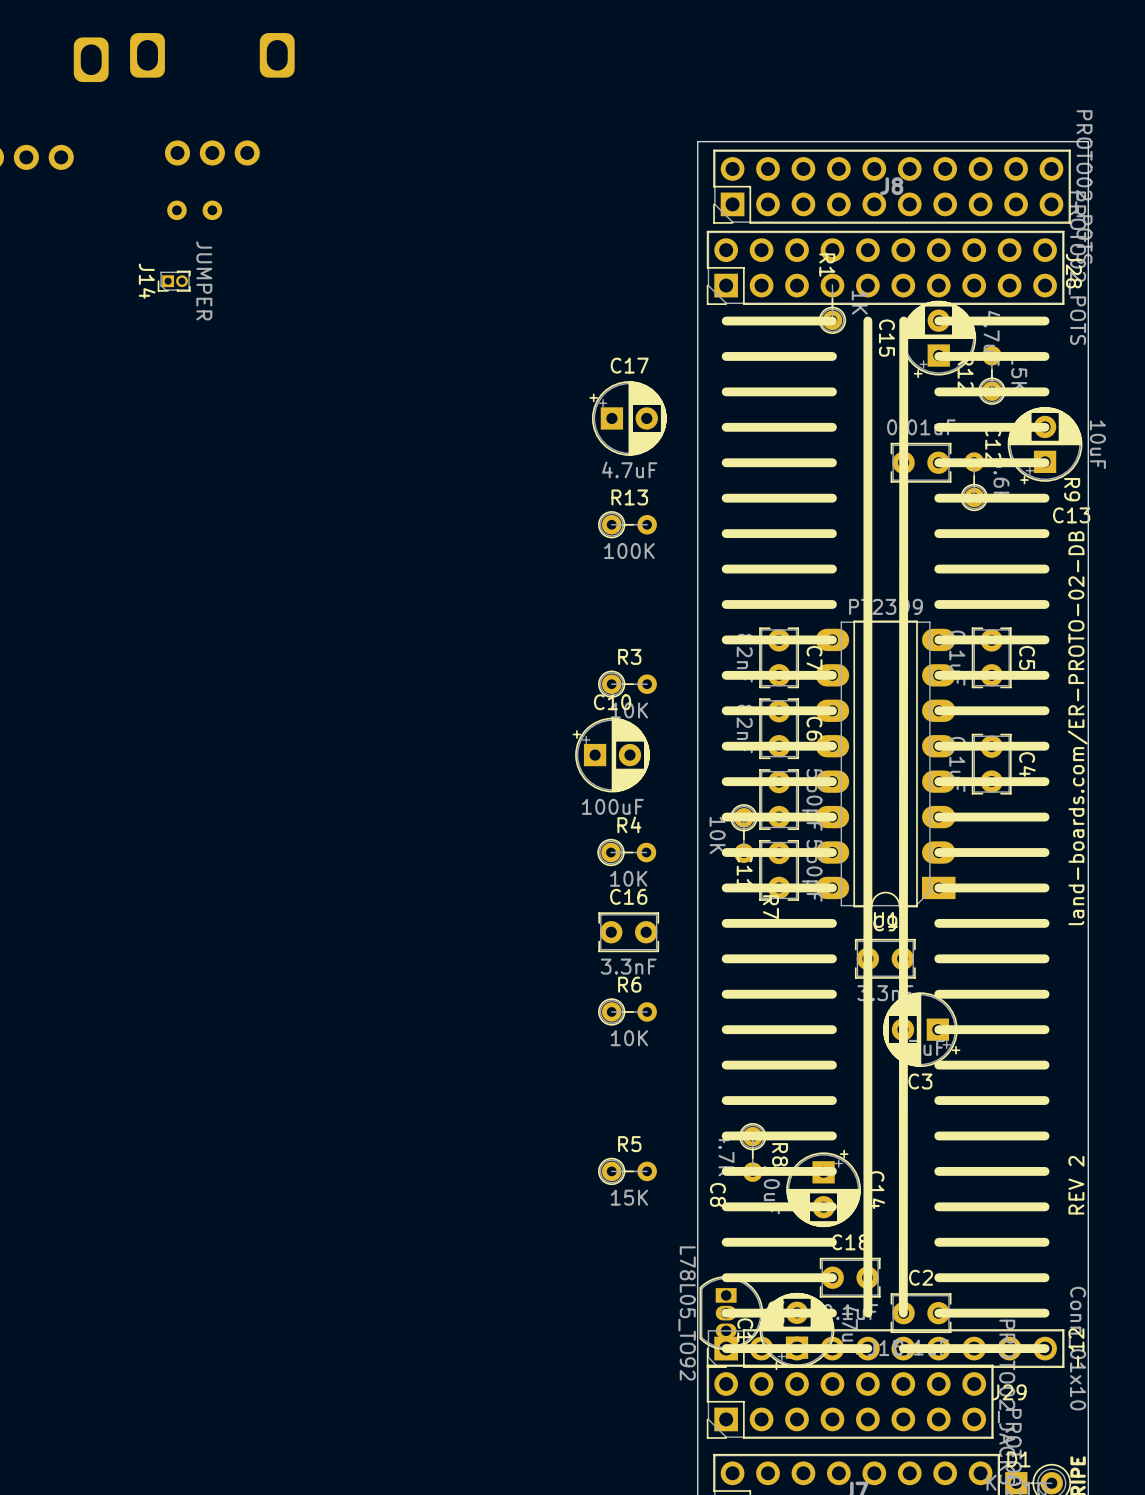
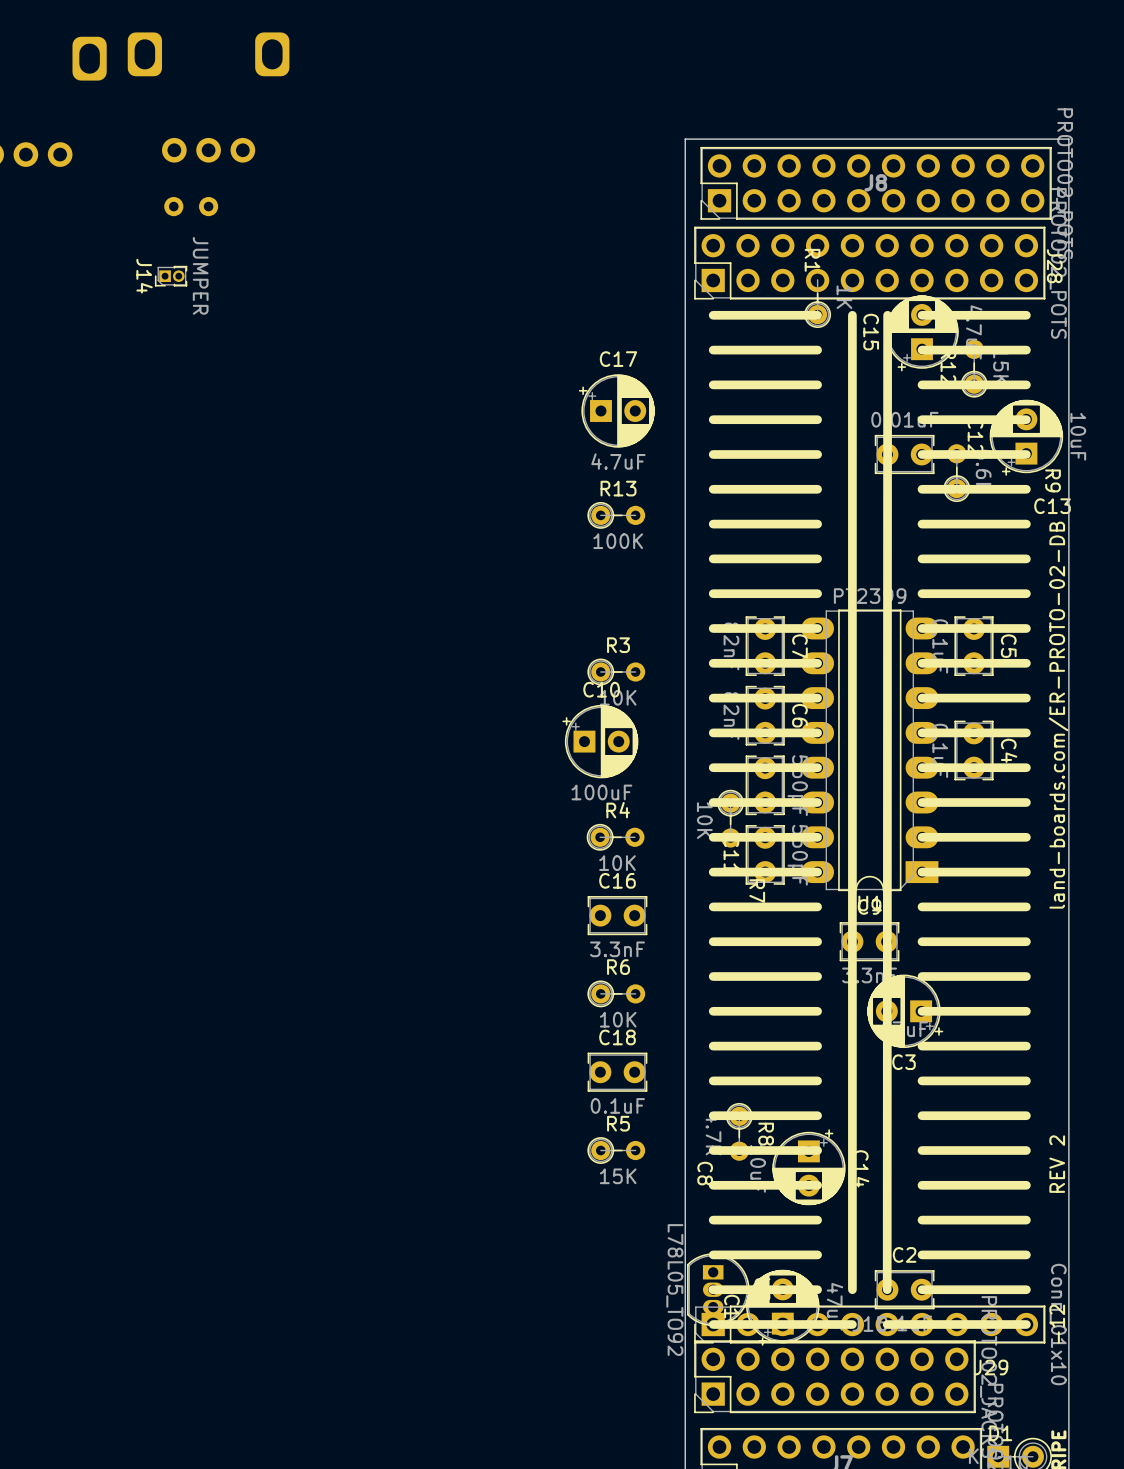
C18 position: (850, 1277) -> (617, 1072)

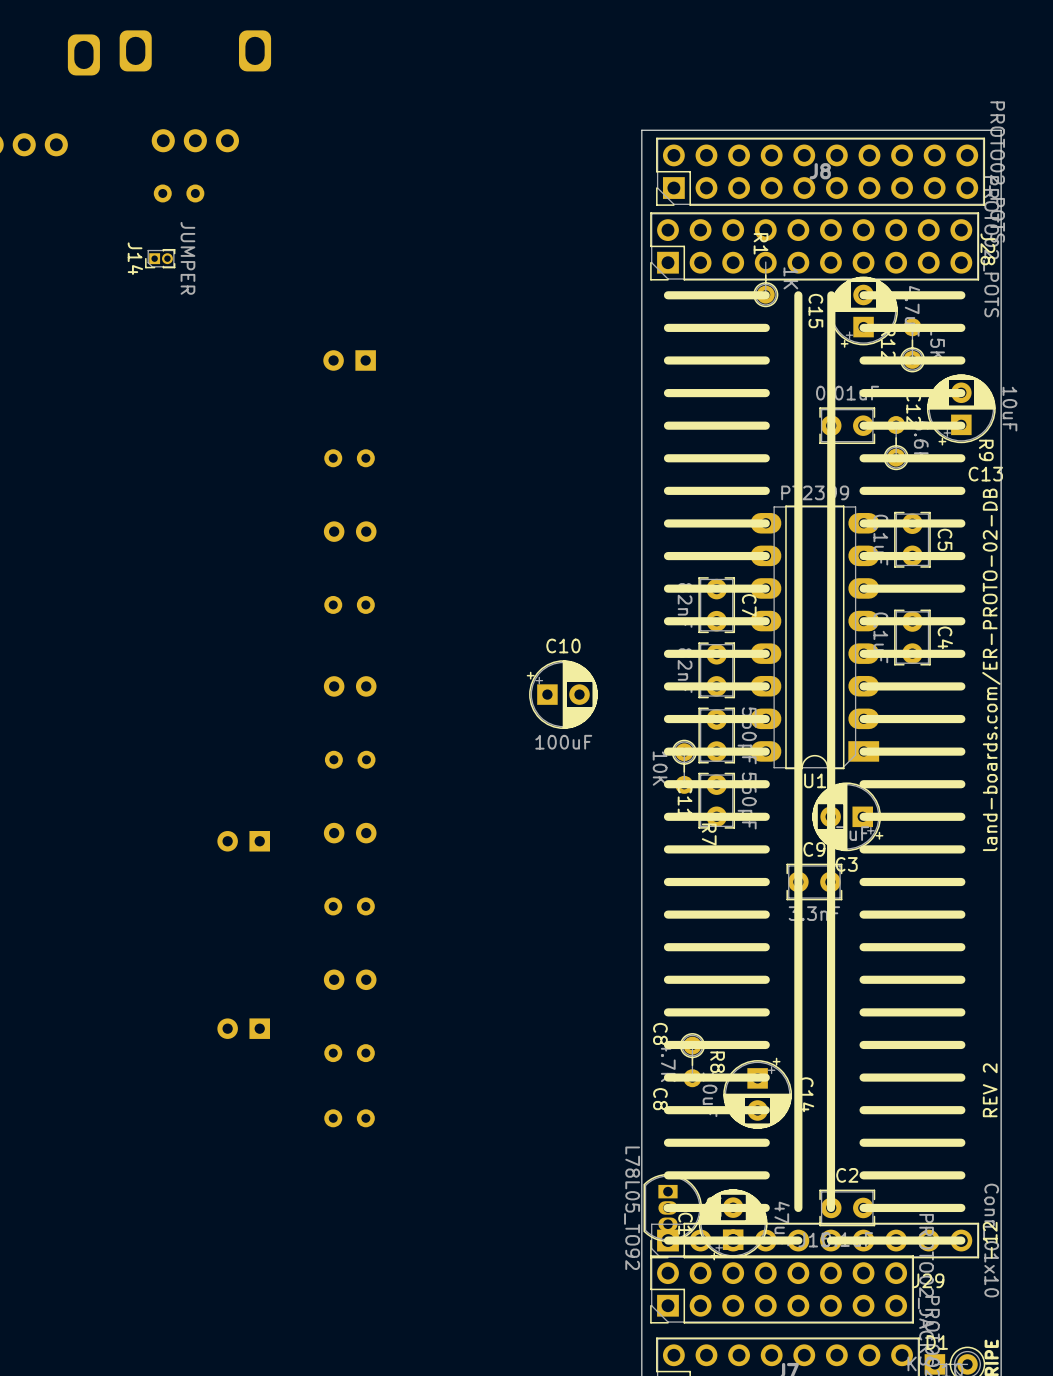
C17 side: bottom (616, 410) -> top (349, 360)
R13 side: bottom (616, 515) -> top (349, 458)
part: none -> (350, 531)
C5 position: (974, 646) -> (912, 539)
R3 side: bottom (616, 672) -> top (349, 604)
C6 name: C6 (799, 715) -> C8 (660, 1033)
part: none -> (350, 686)
U1 position: (869, 750) -> (814, 637)
C4 position: (974, 750) -> (912, 637)
R4 side: bottom (615, 837) -> top (350, 759)
part: none -> (243, 841)
C16 side: bottom (617, 915) -> top (350, 833)
R6 side: bottom (616, 993) -> top (349, 906)
C3 position: (905, 1011) -> (847, 816)
C18 side: bottom (617, 1072) -> top (350, 979)
part: none -> (243, 1028)
R5 side: bottom (616, 1150) -> top (349, 1053)
part: none -> (349, 1118)

